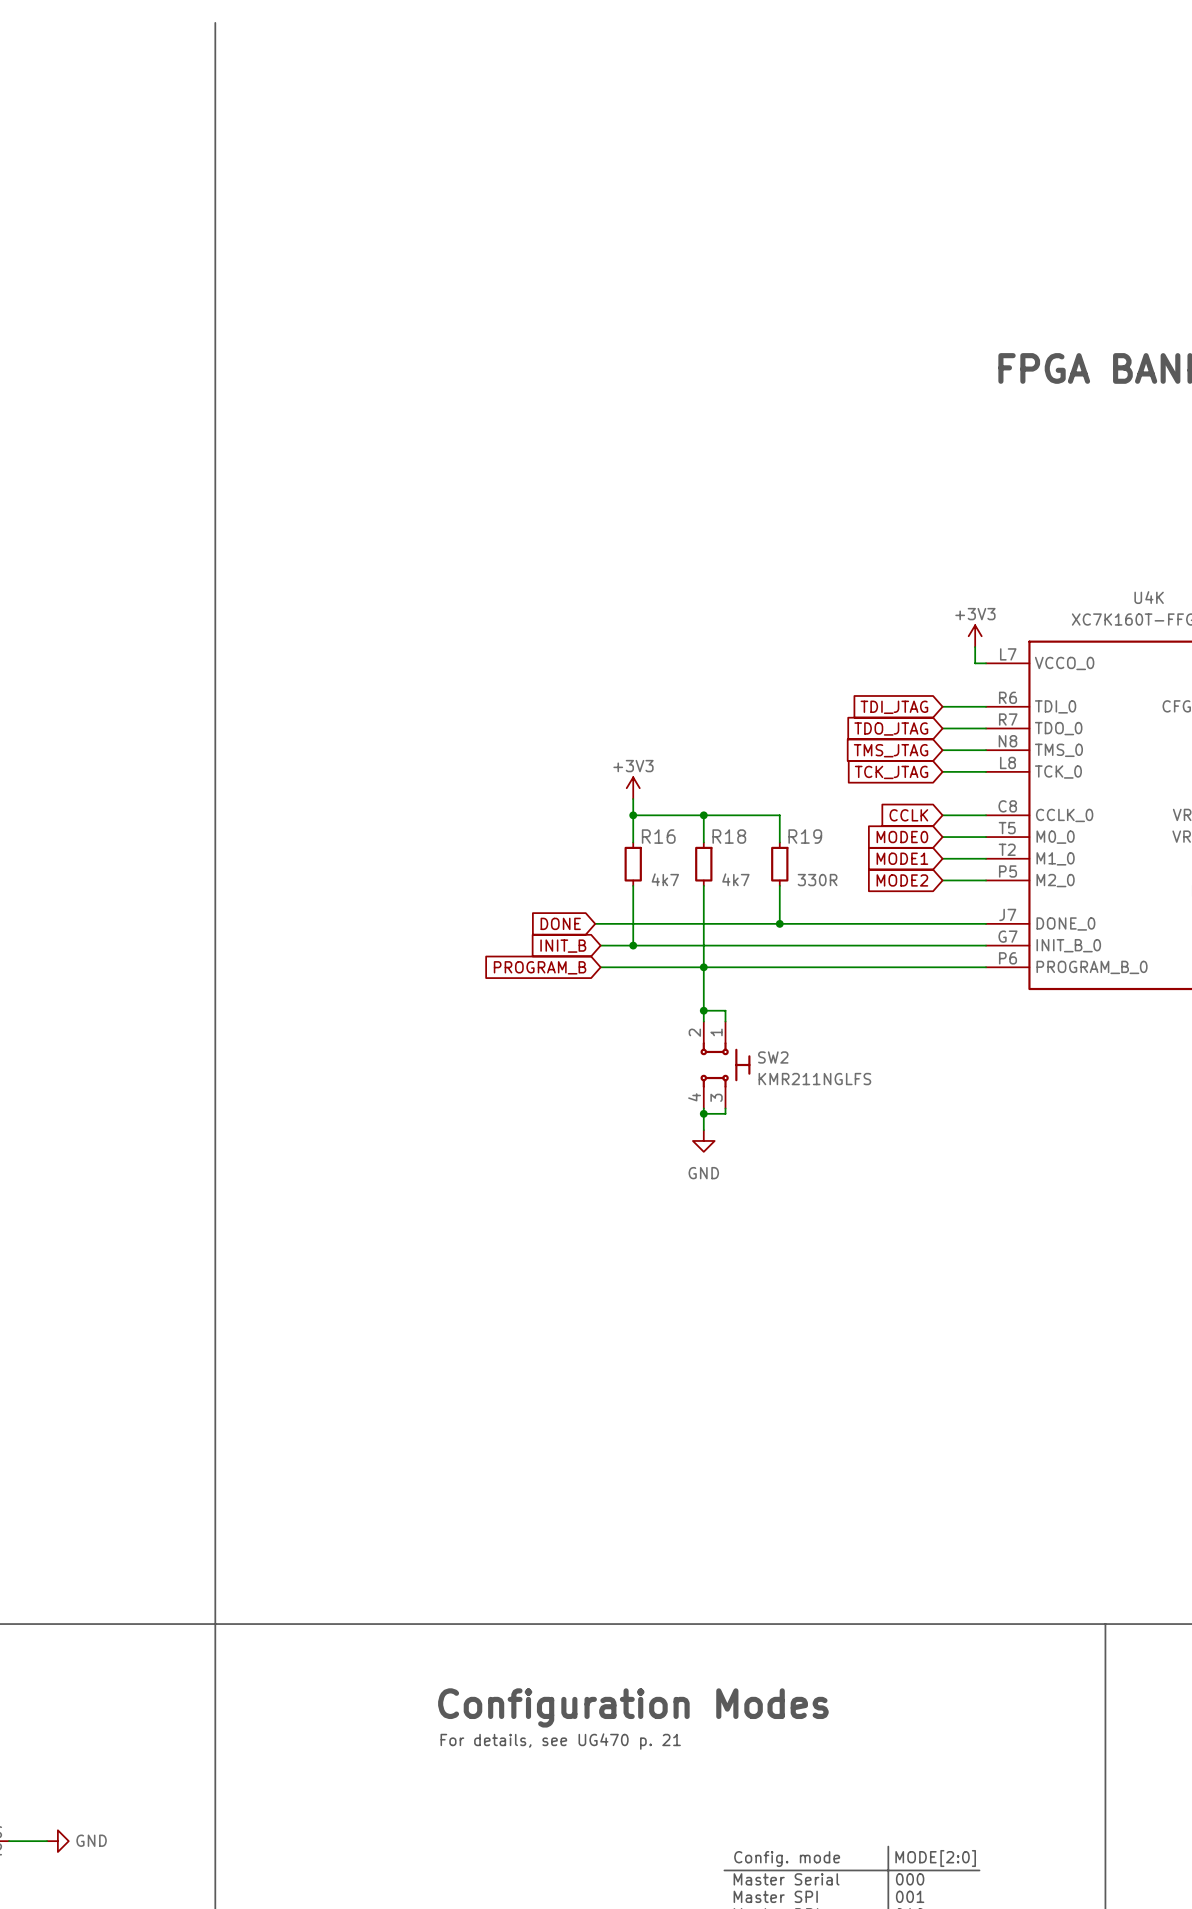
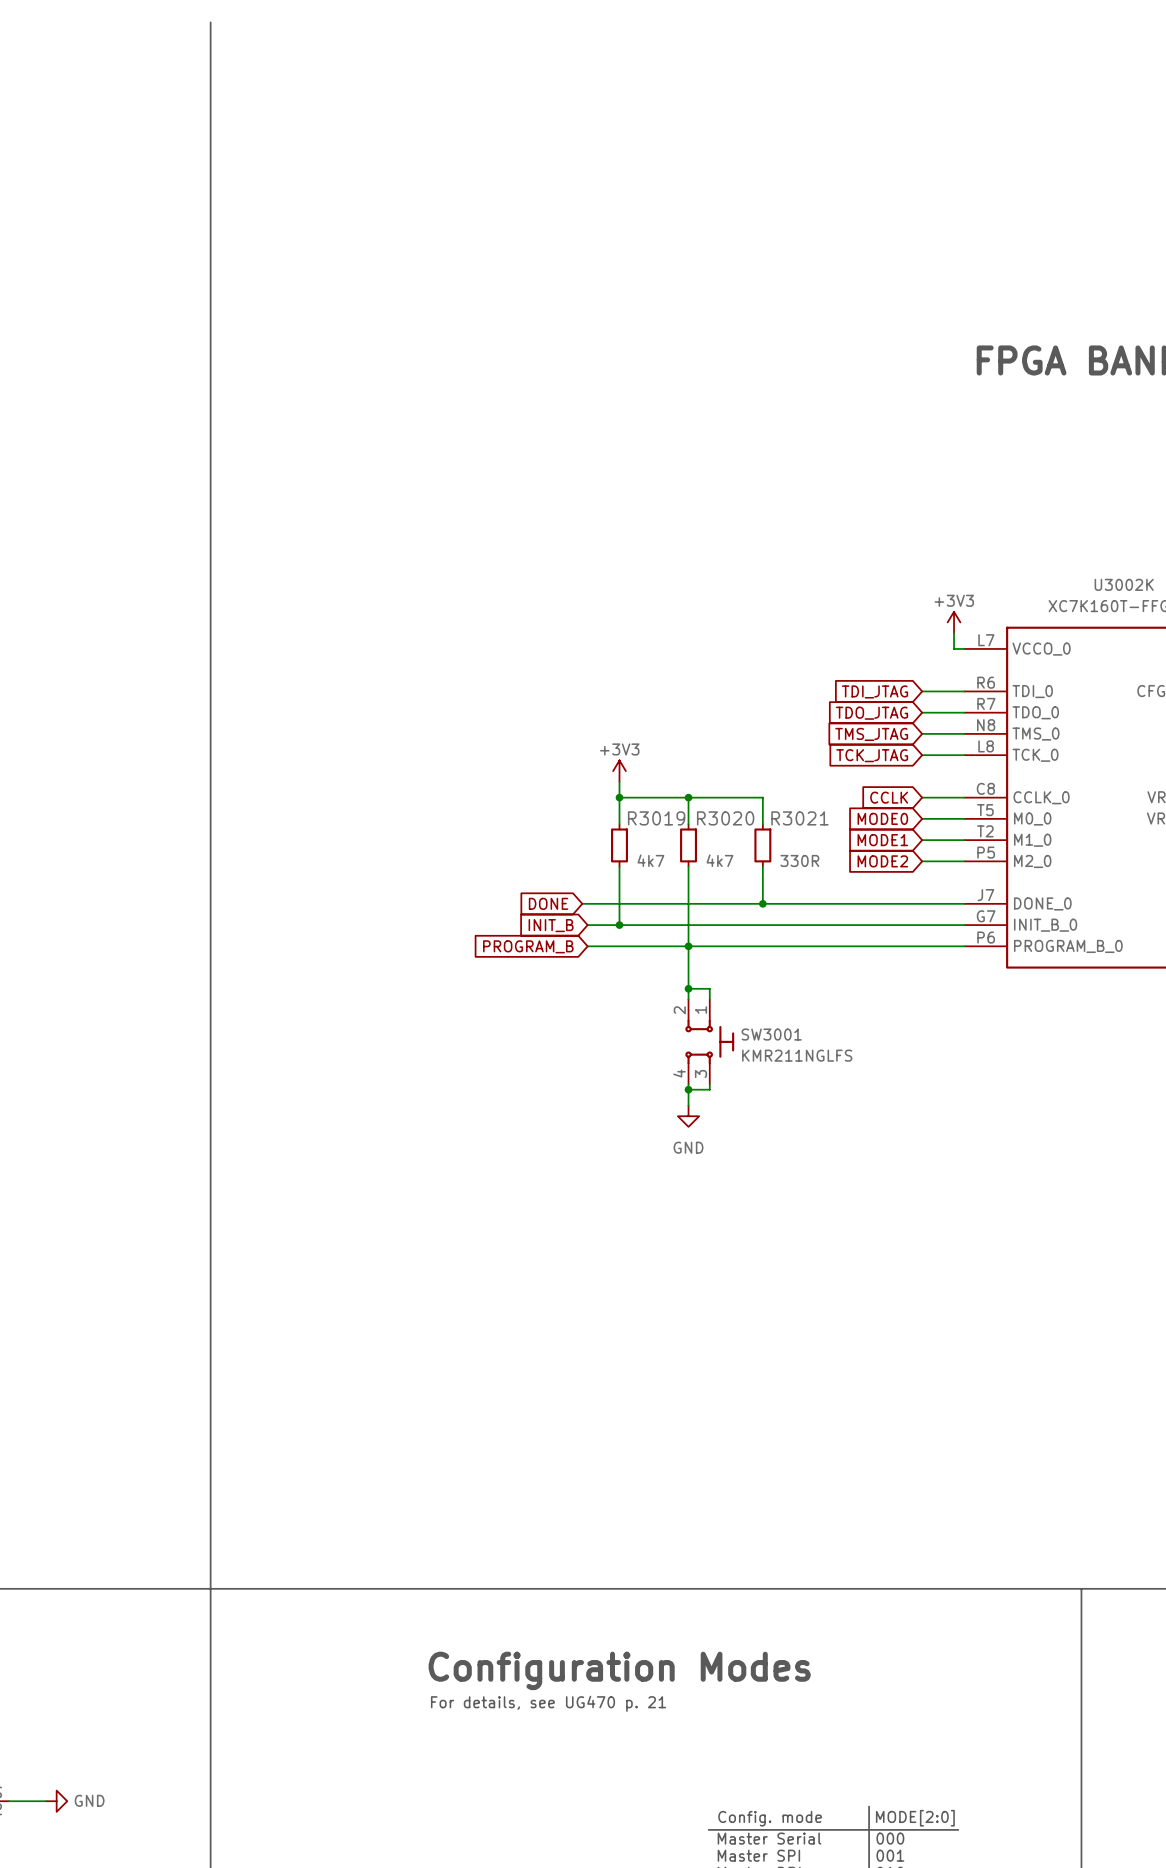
U4K name: U4K (1149, 597) -> U3002K (1124, 584)
R16 name: R16 (658, 836) -> R3019 (656, 818)
R18 name: R18 (729, 836) -> R3020 (725, 818)
R19 name: R19 (805, 836) -> R3021 (799, 818)
SW2 name: SW2 (773, 1057) -> SW3001 (771, 1034)

